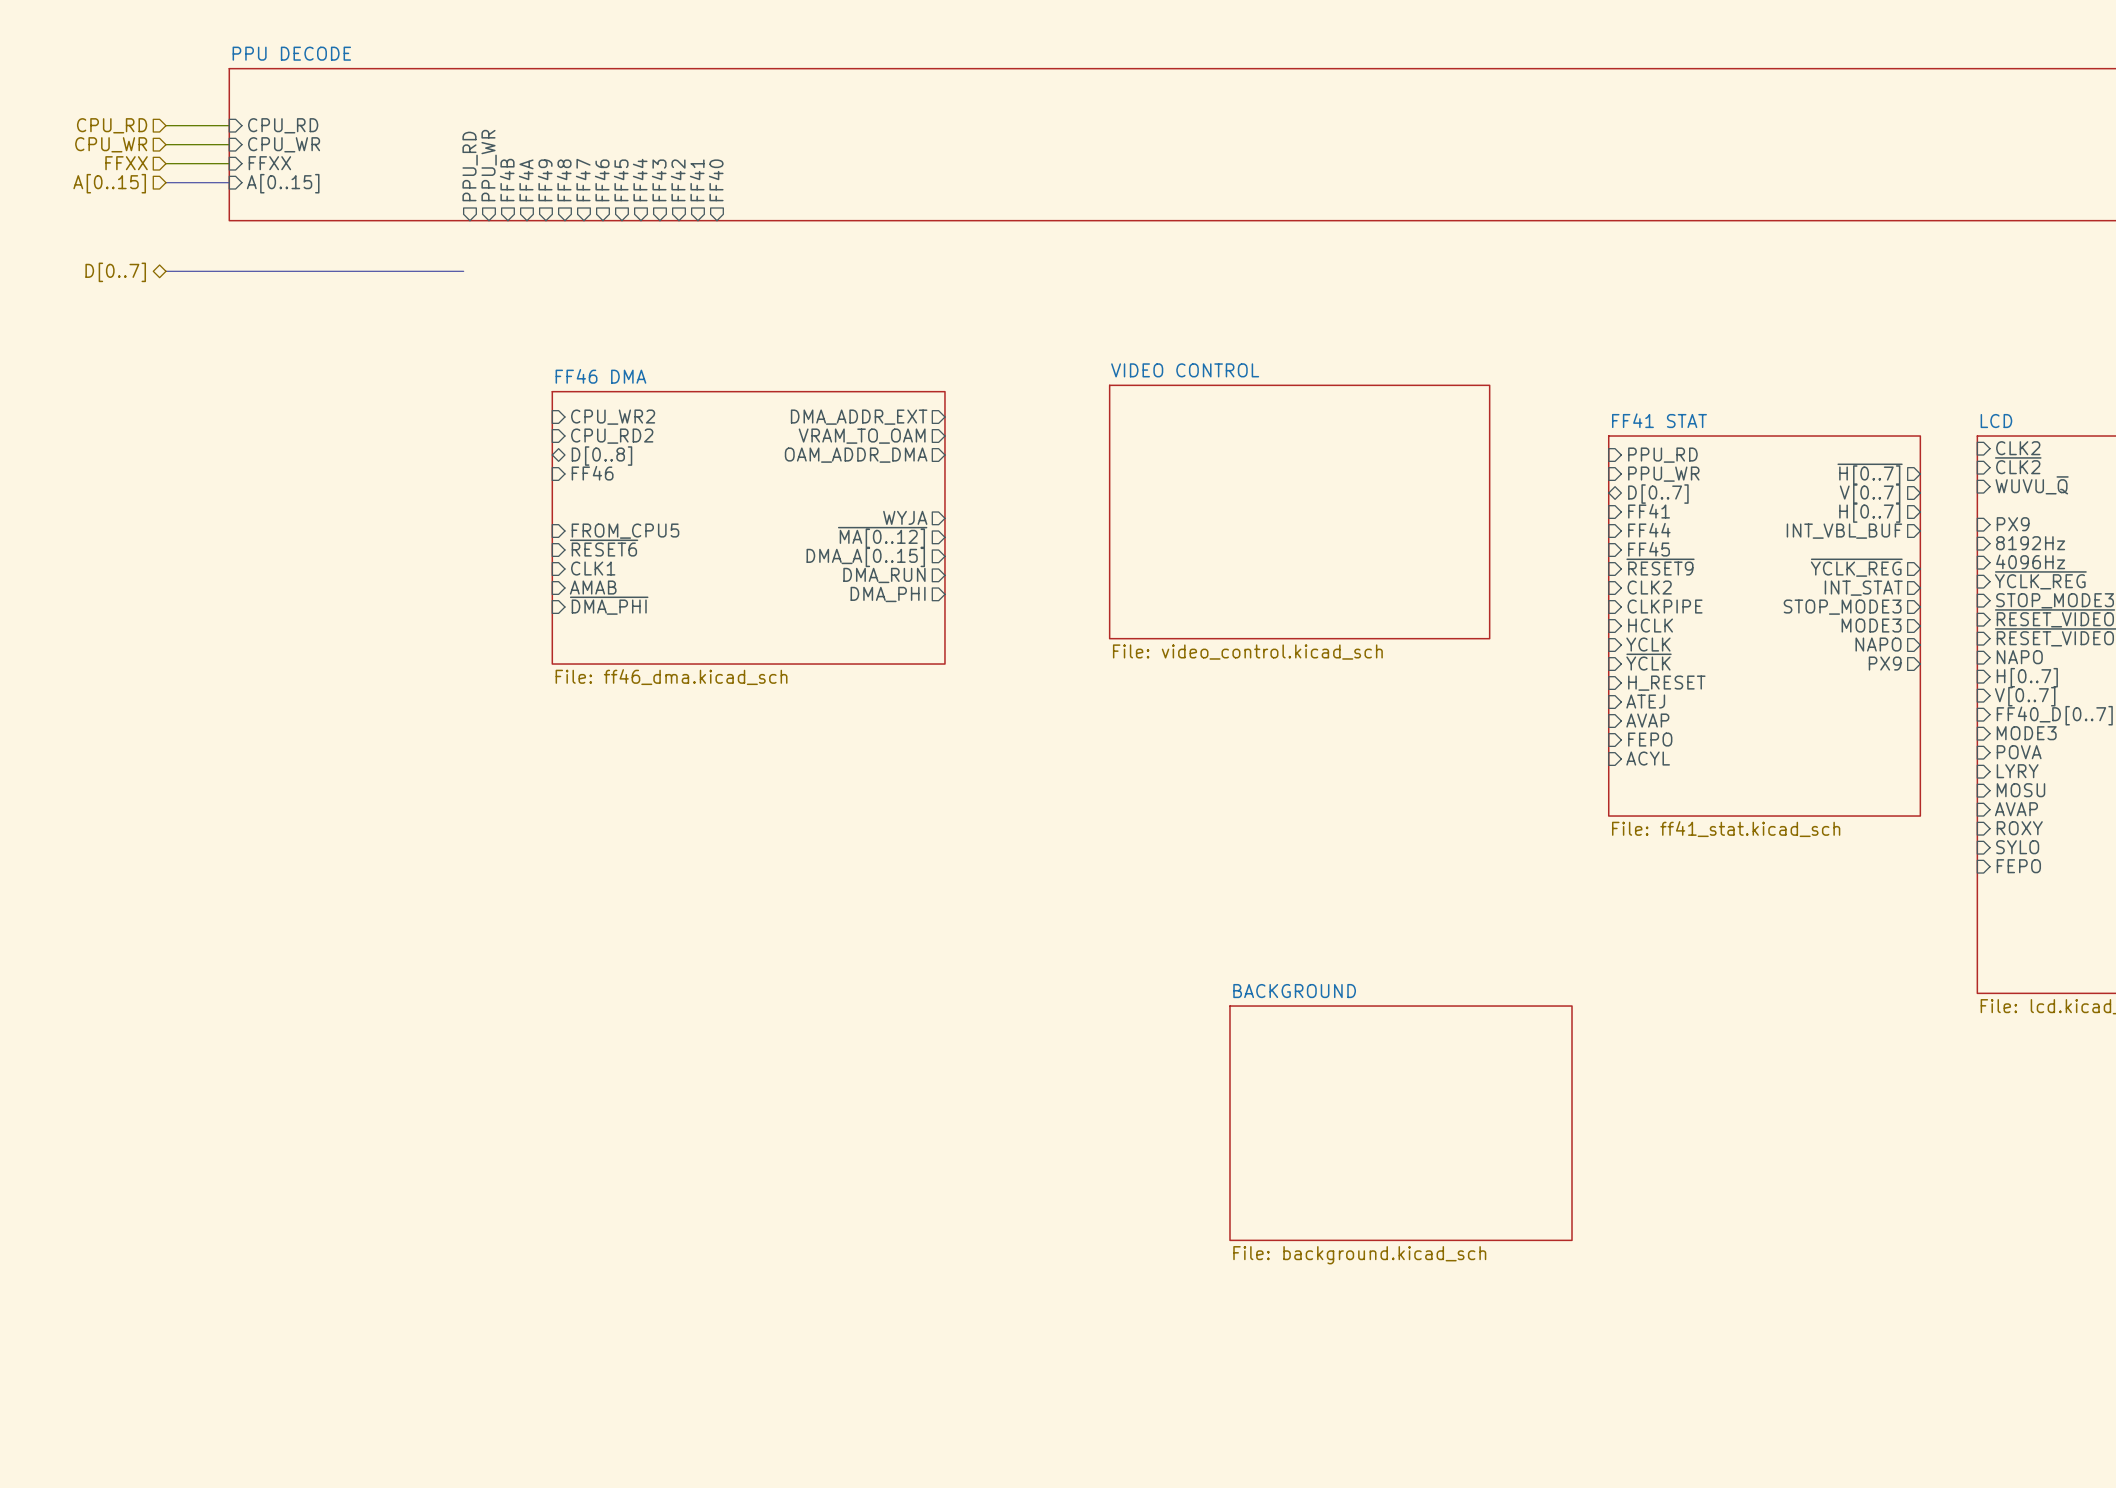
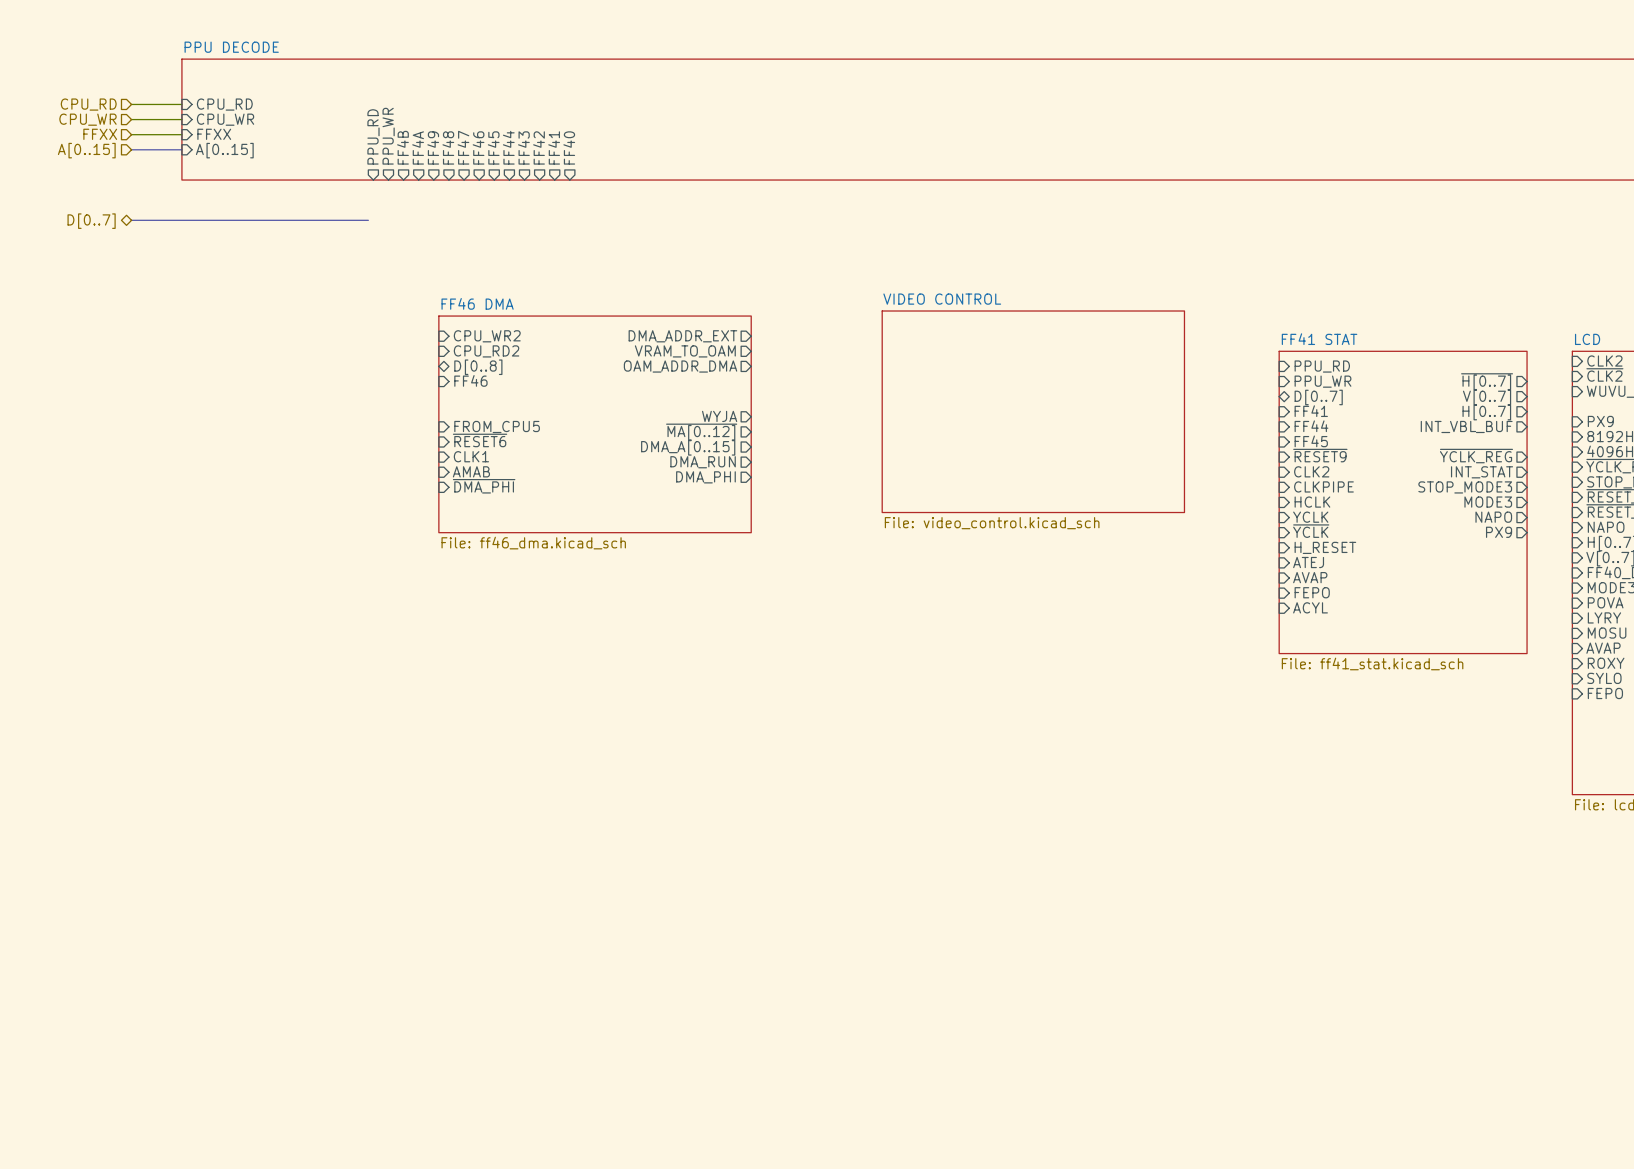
sheet BACKGROUND: File: background.kicad_sch (1400, 1123) -> none

